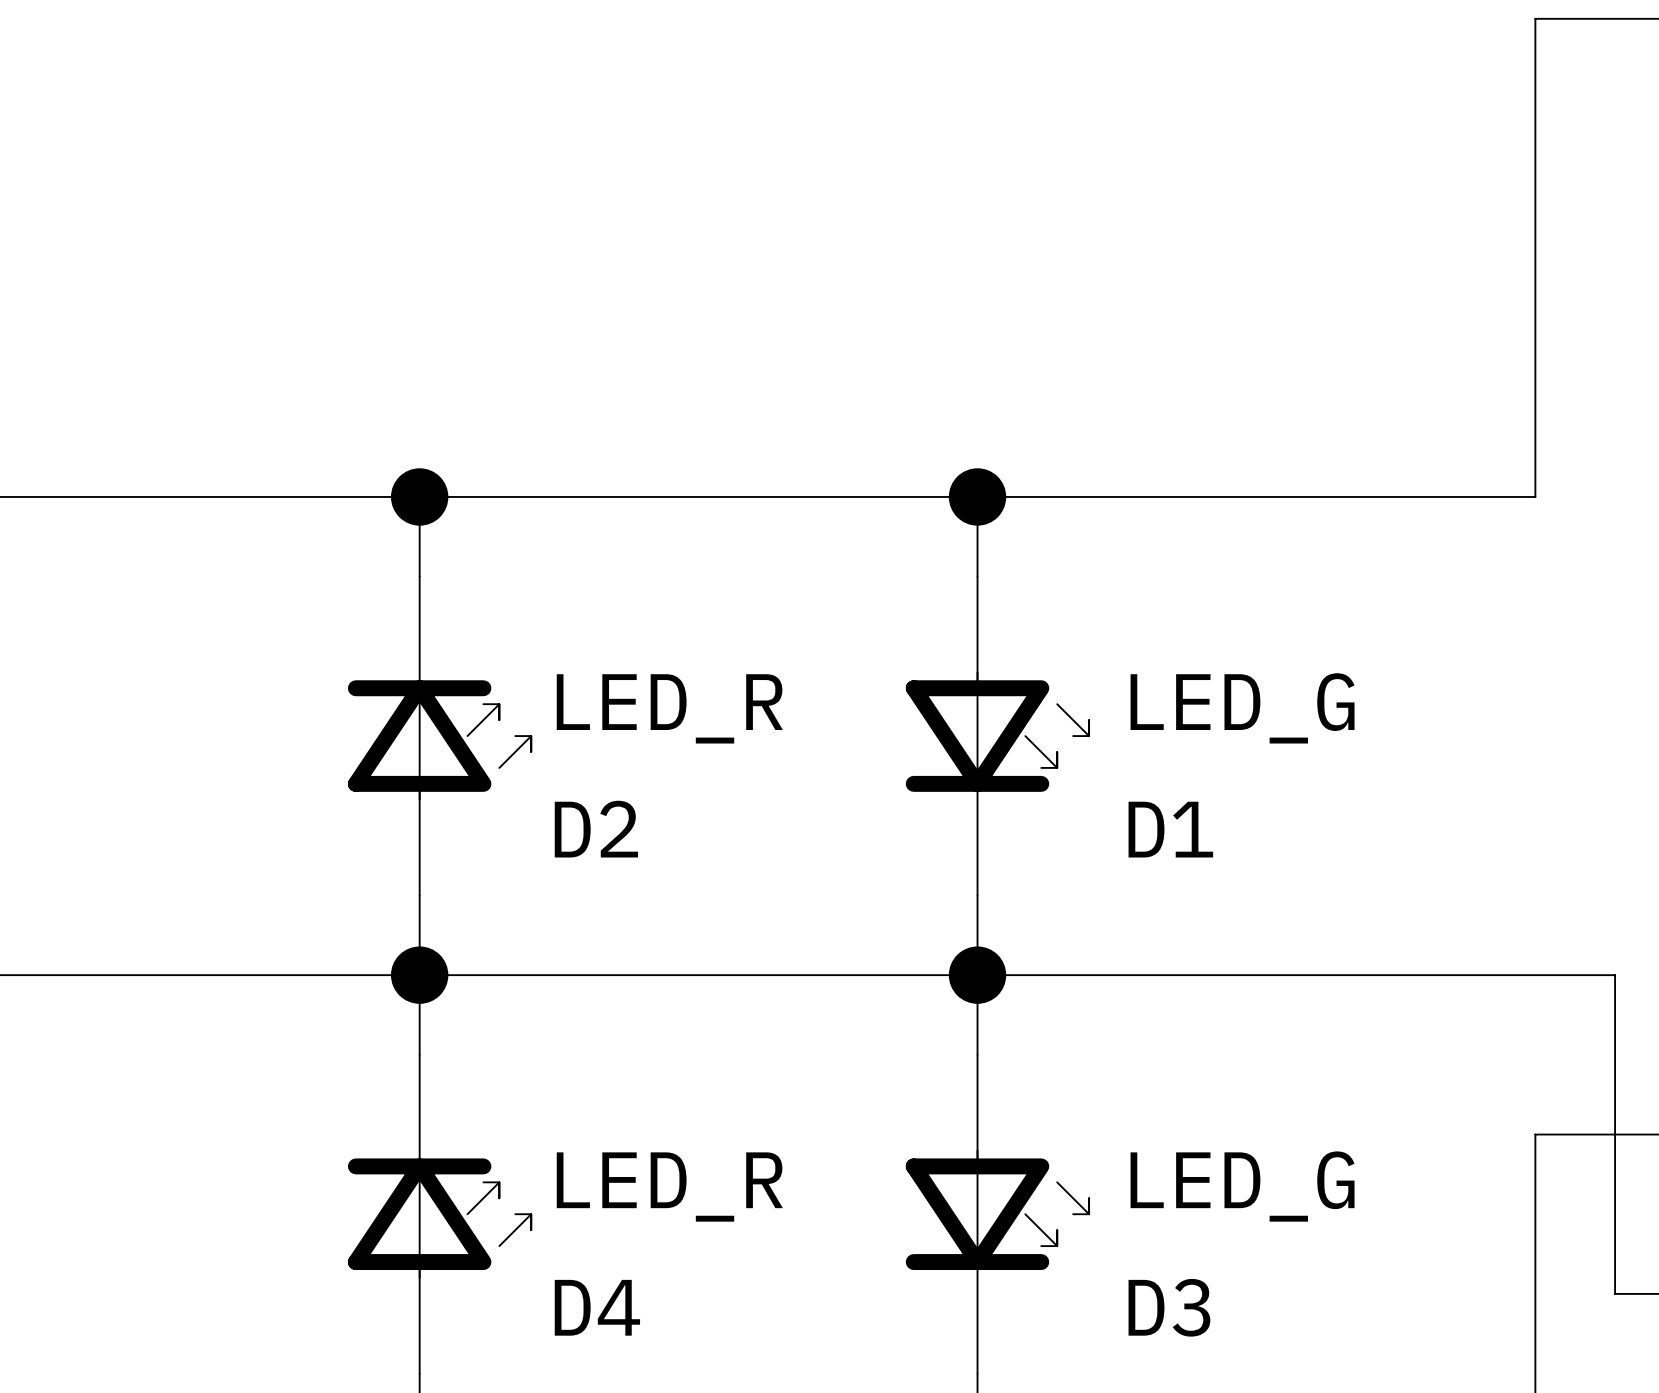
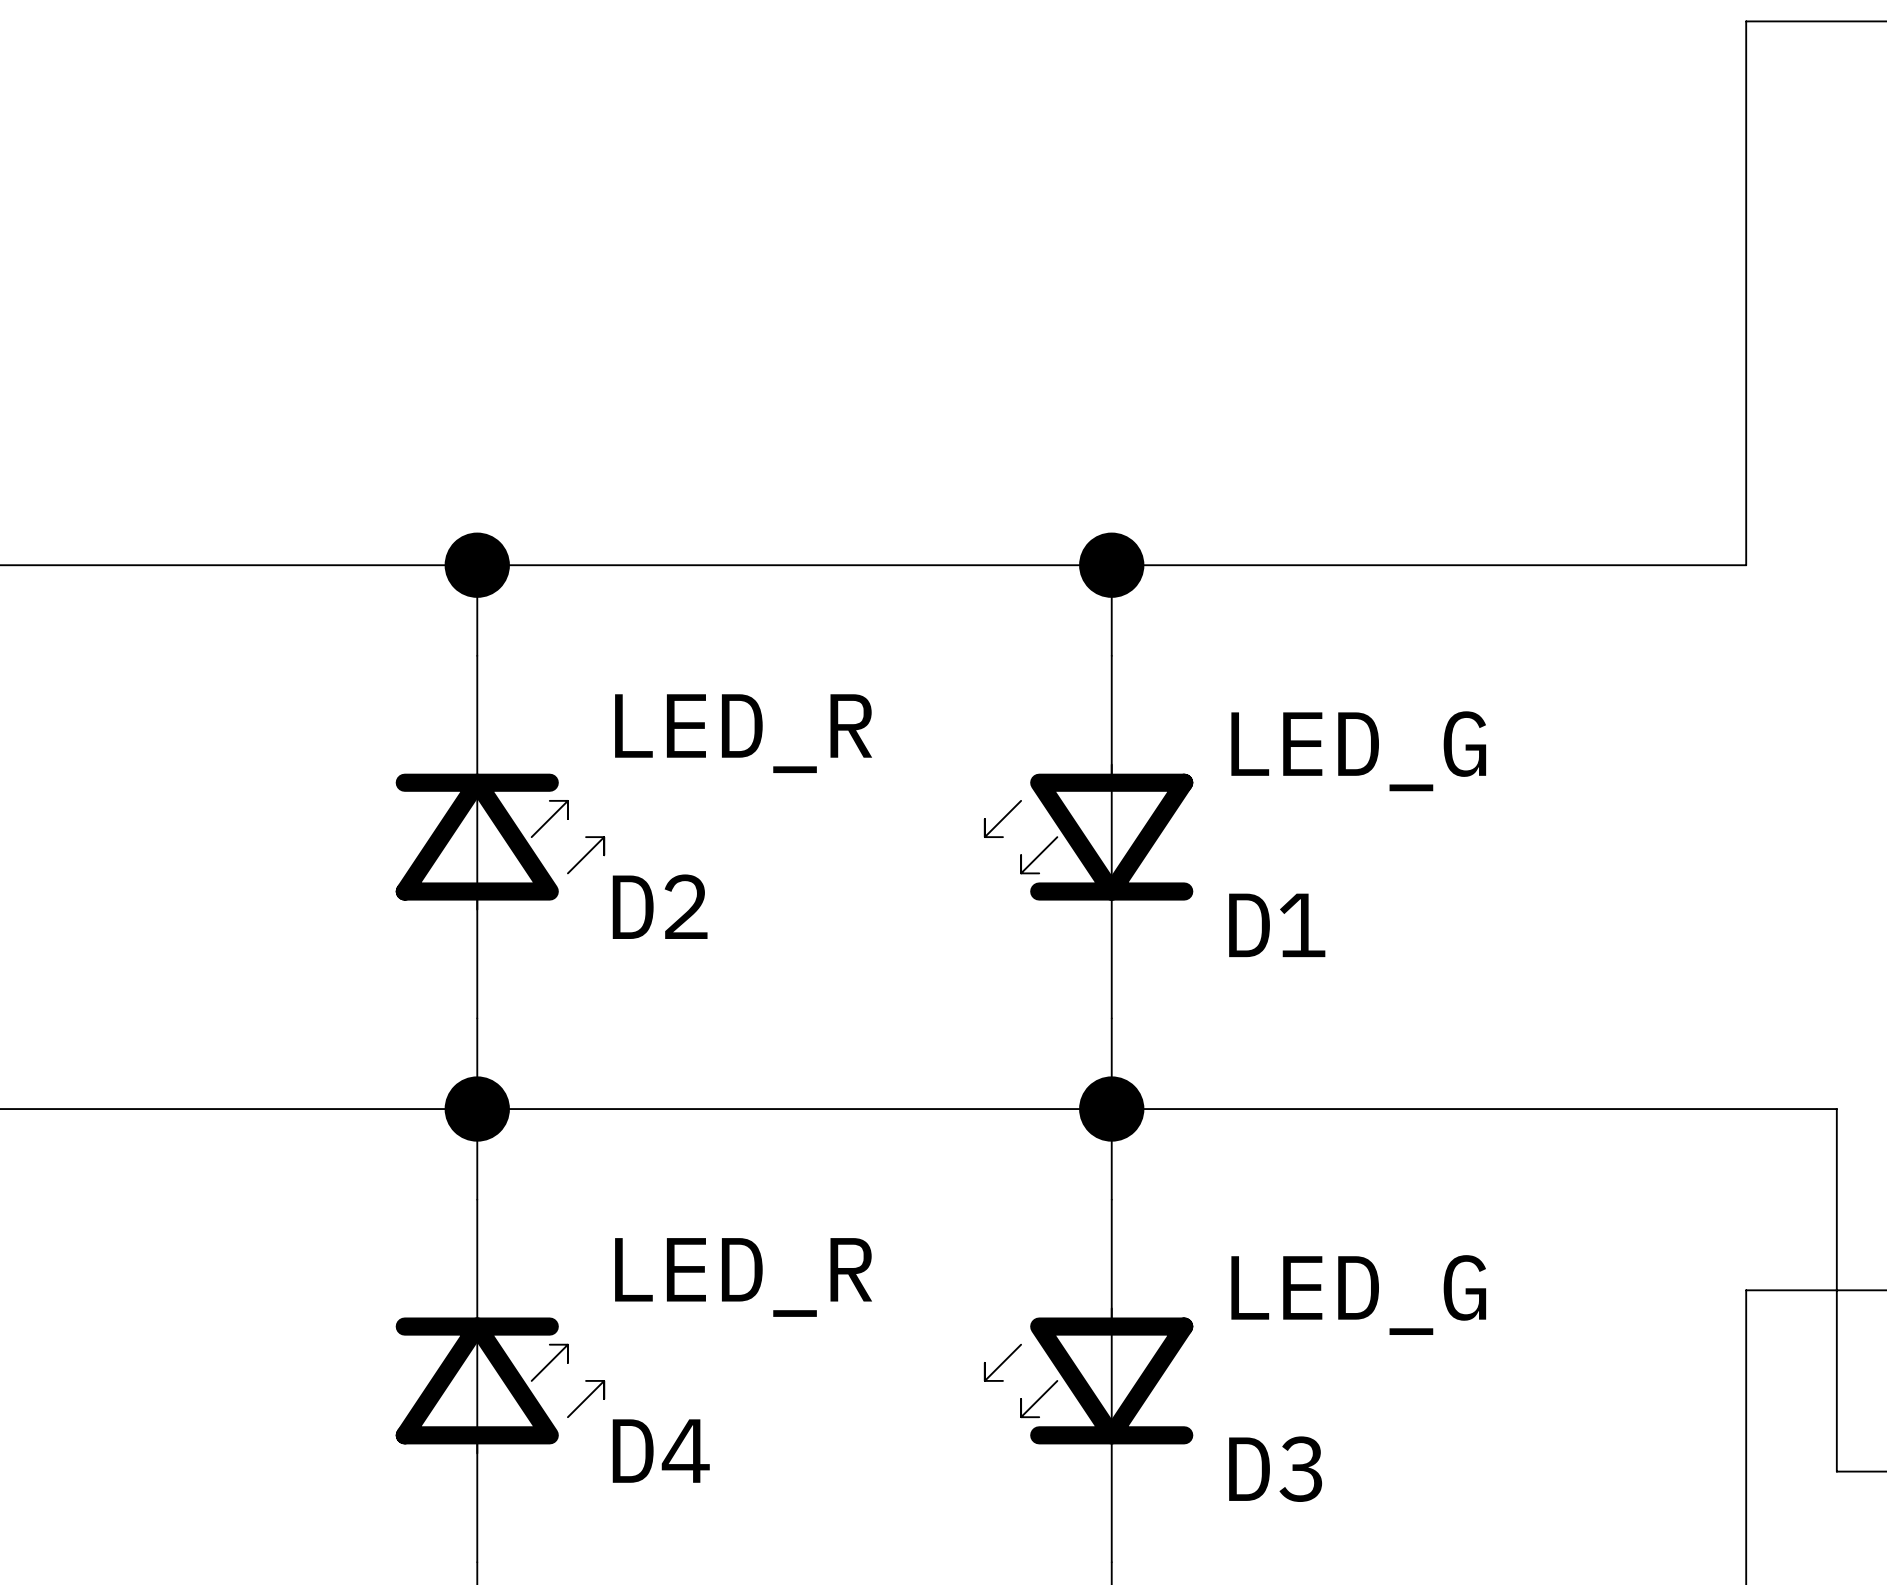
D2 value position: LED_R (669, 708) -> LED_R (743, 733)
D1 flip: as is (997, 732) -> left-right (1089, 832)
D2 name position: D2 (596, 829) -> D2 (660, 906)
D4 value position: LED_R (669, 1187) -> LED_R (743, 1277)
D3 flip: as is (997, 1210) -> left-right (1089, 1376)
D4 name position: D4 (597, 1307) -> D4 (661, 1451)

